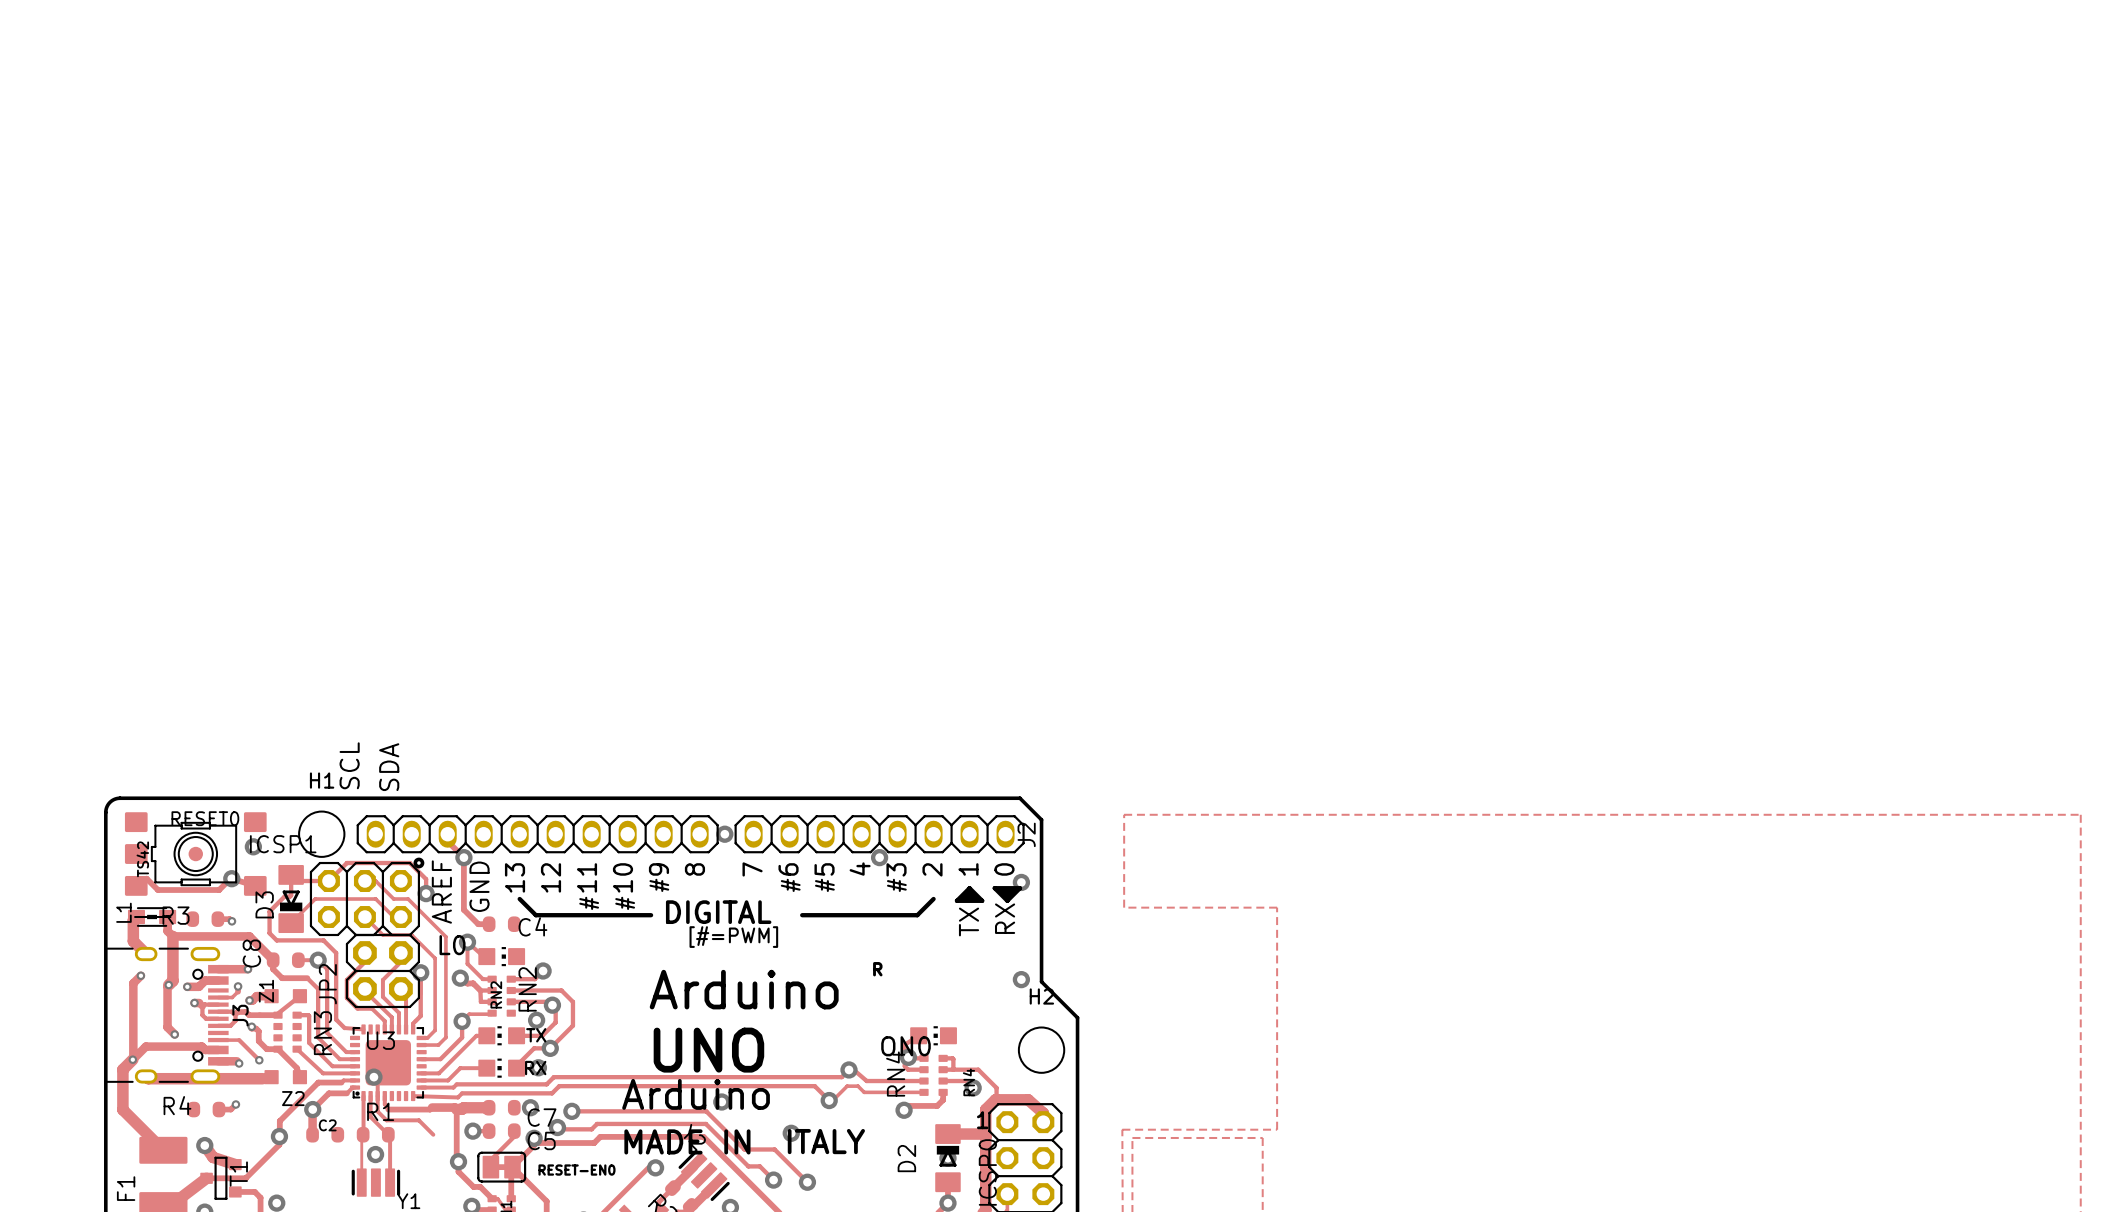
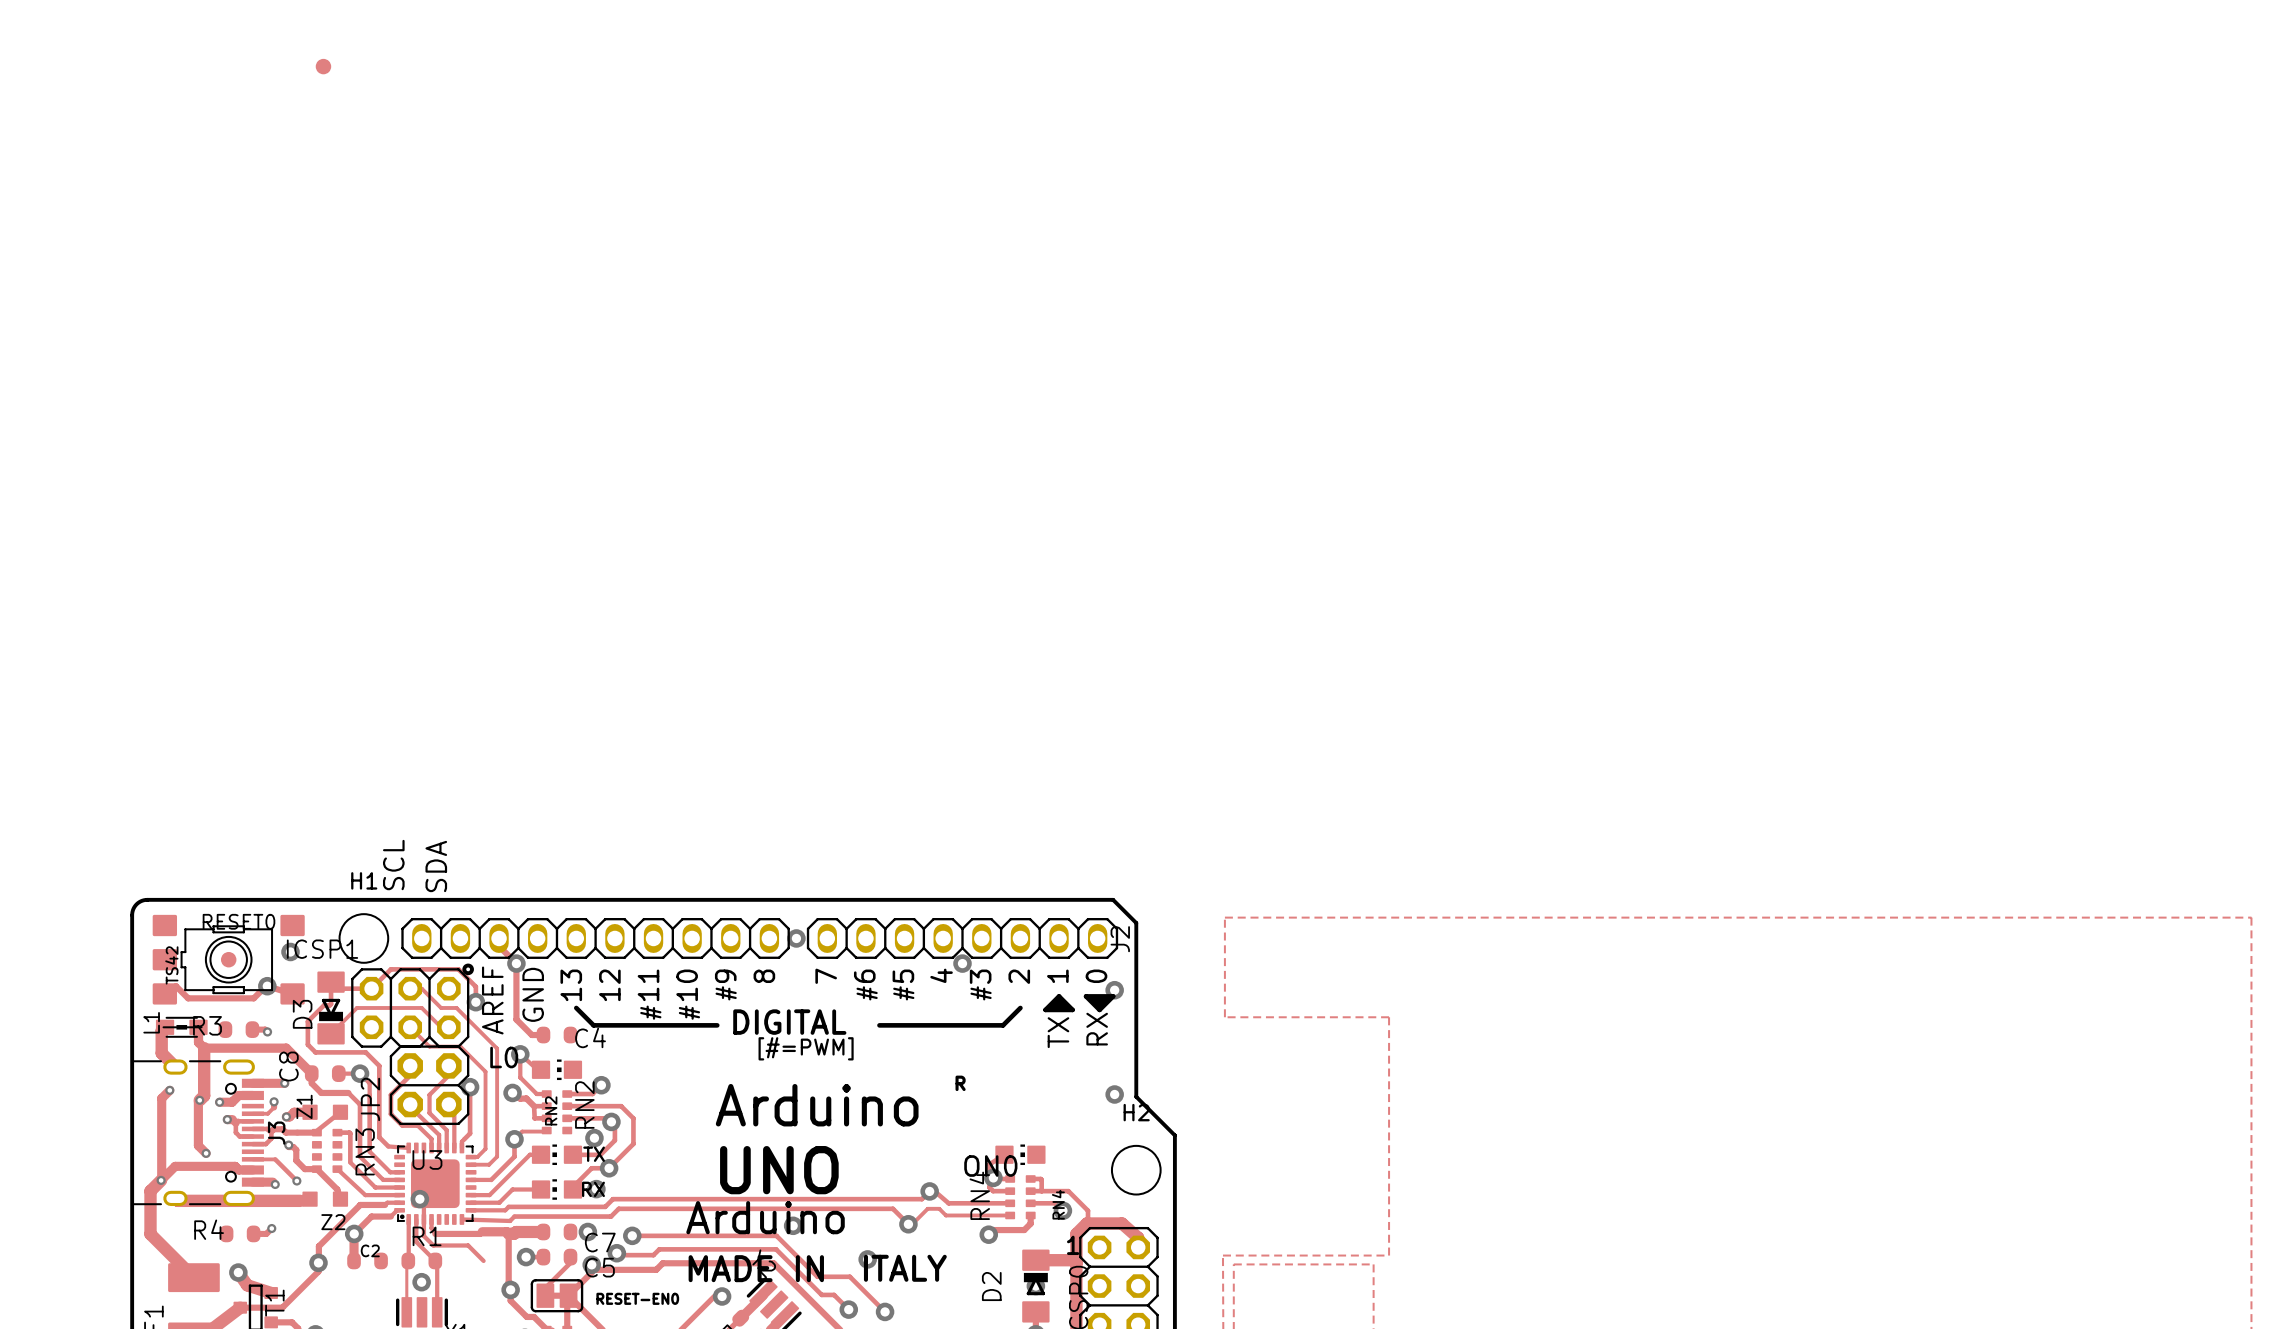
part: none -> (323, 66)

